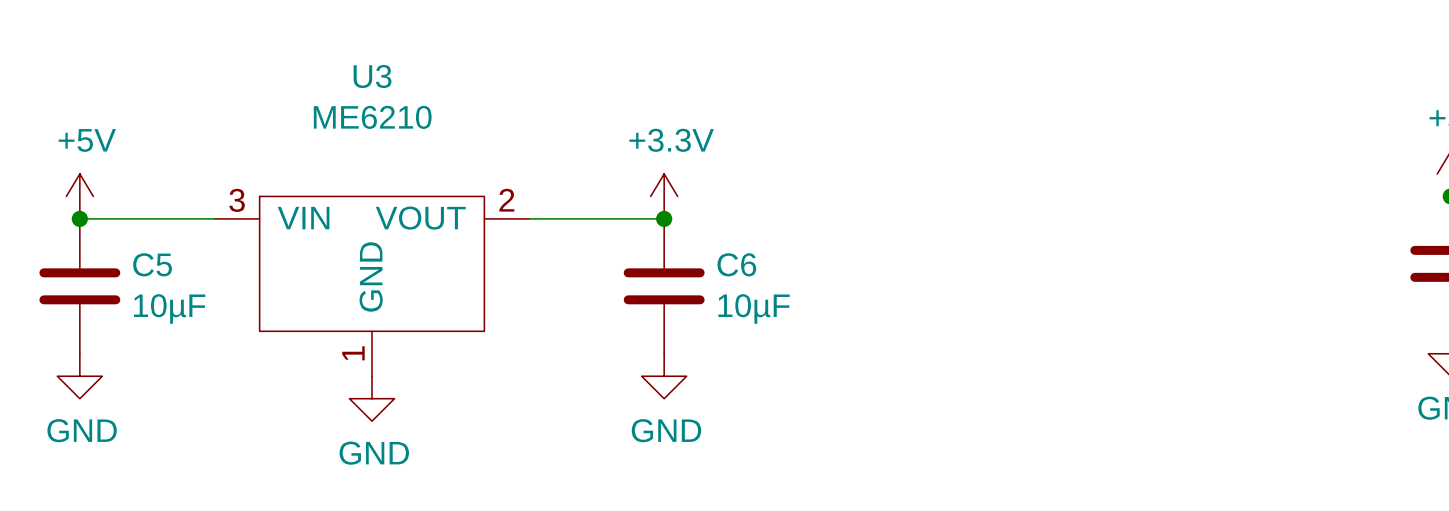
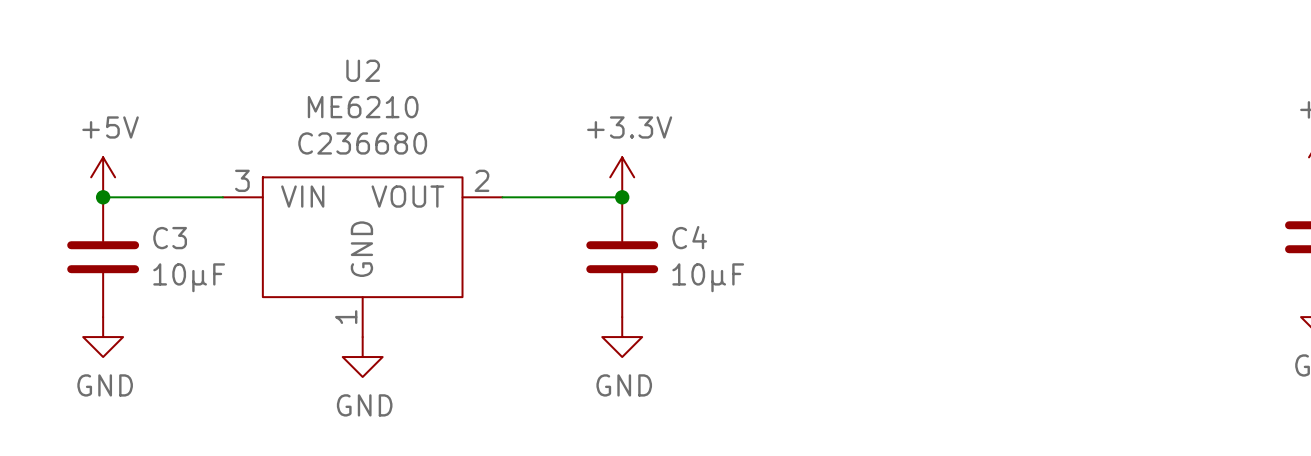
U3 name: U3 (372, 76) -> U2 (363, 70)
U3 text: none -> C236680 (362, 143)
C5 name: C5 (152, 264) -> C3 (170, 238)
C6 name: C6 (736, 264) -> C4 (689, 237)

